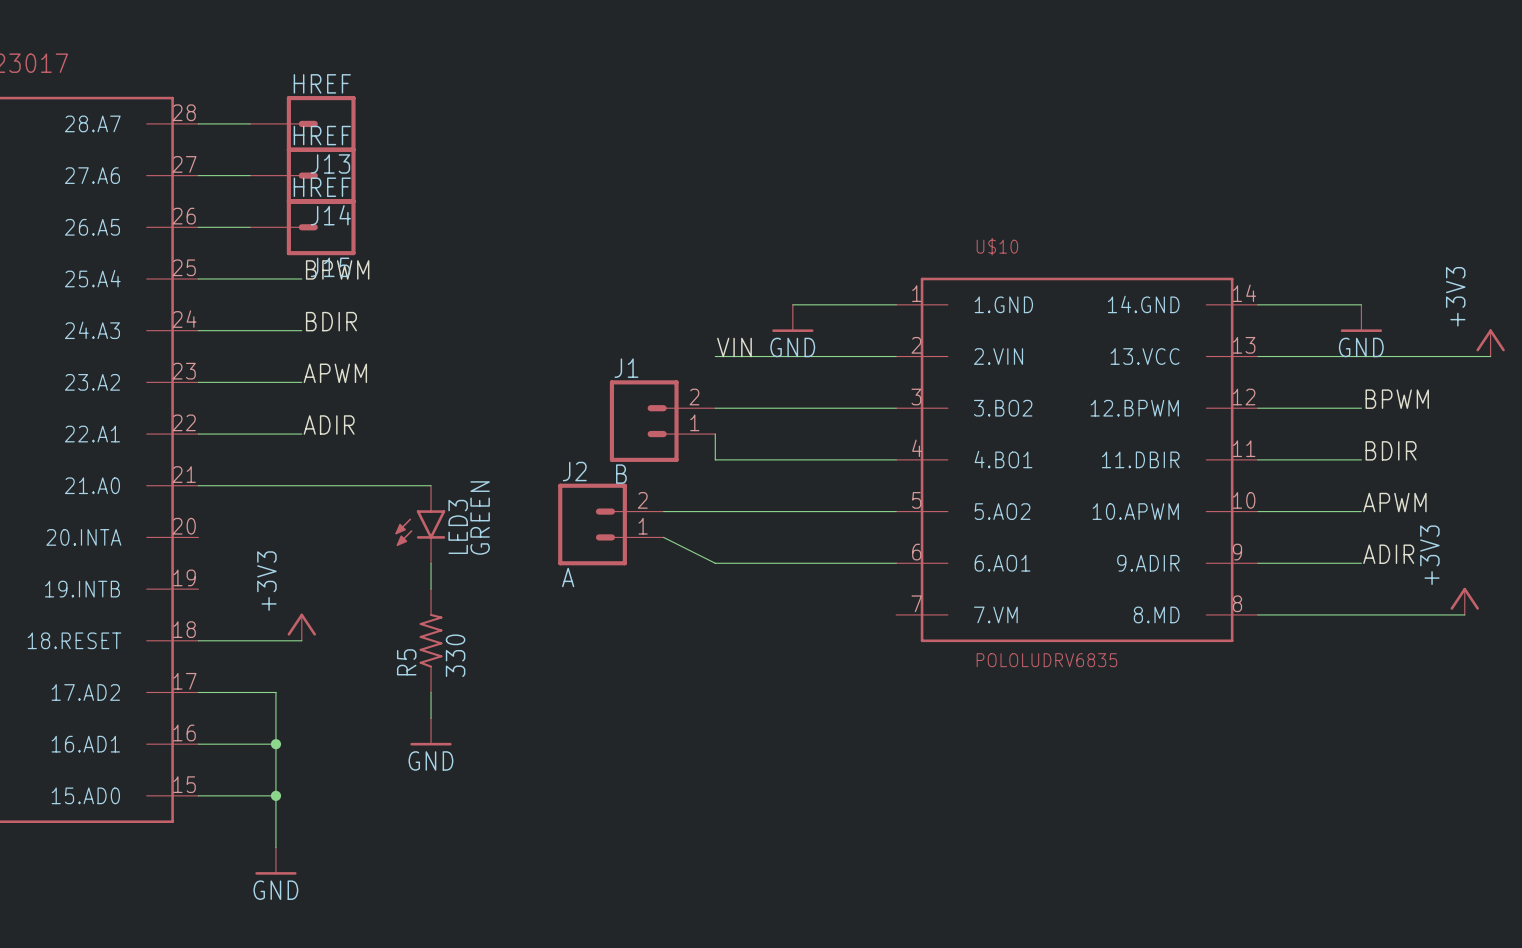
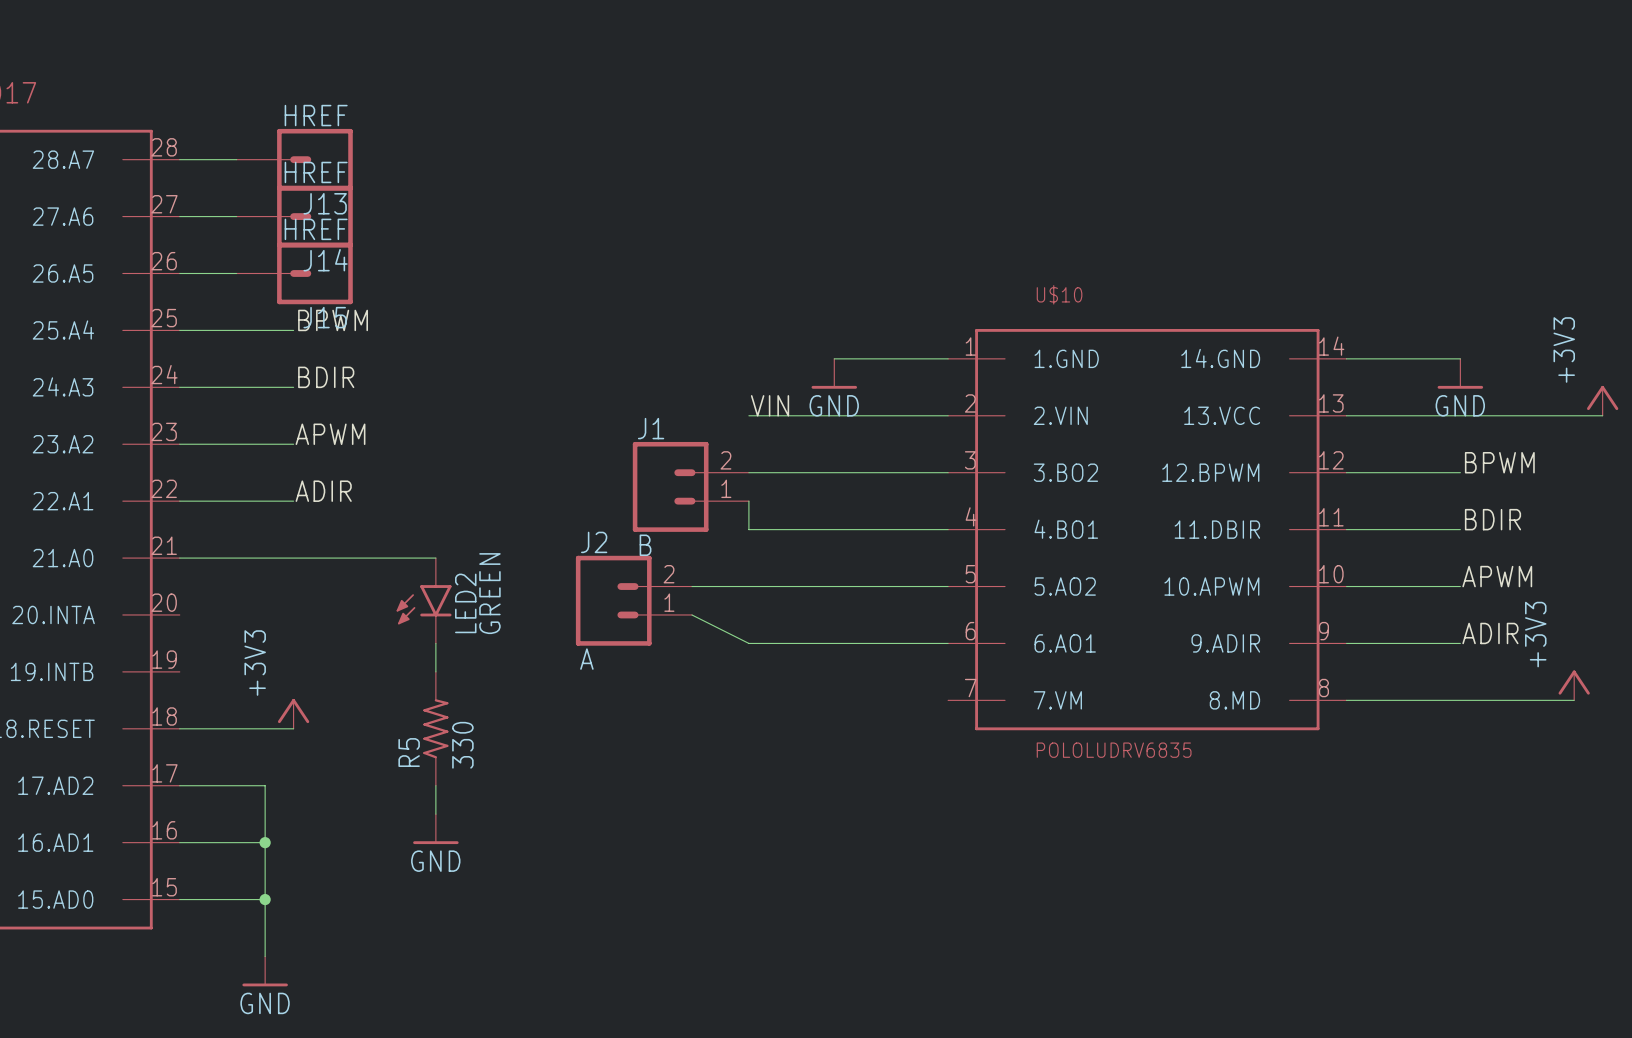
LED3 name: LED3 (458, 526) -> LED2 (465, 603)

